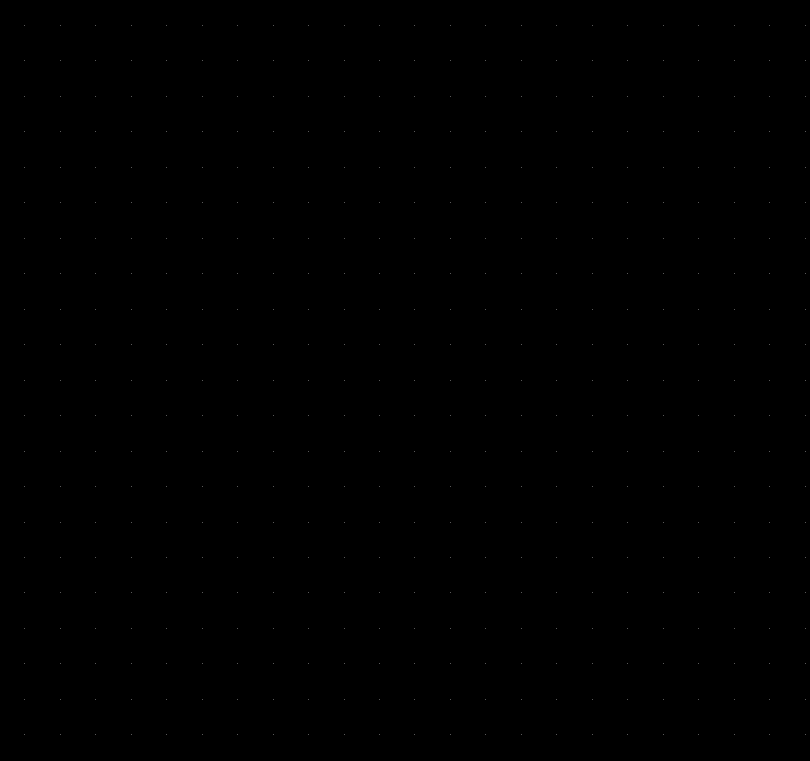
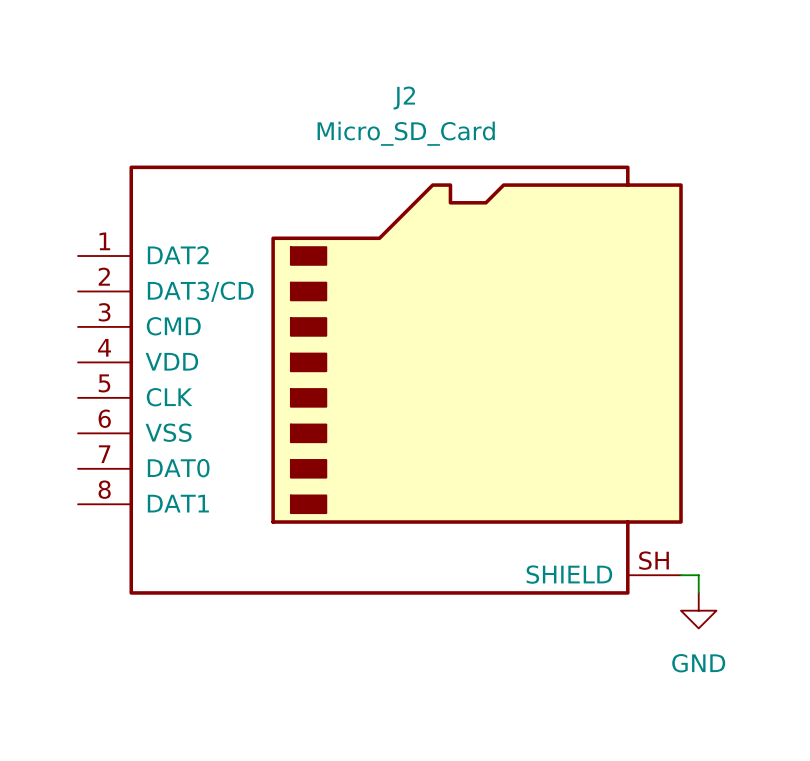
J2: none -> Micro_SD_Card (380, 380)
wire: none -> (681, 575) (698, 575) (698, 592)
power symbol: none -> GND (698, 610)

